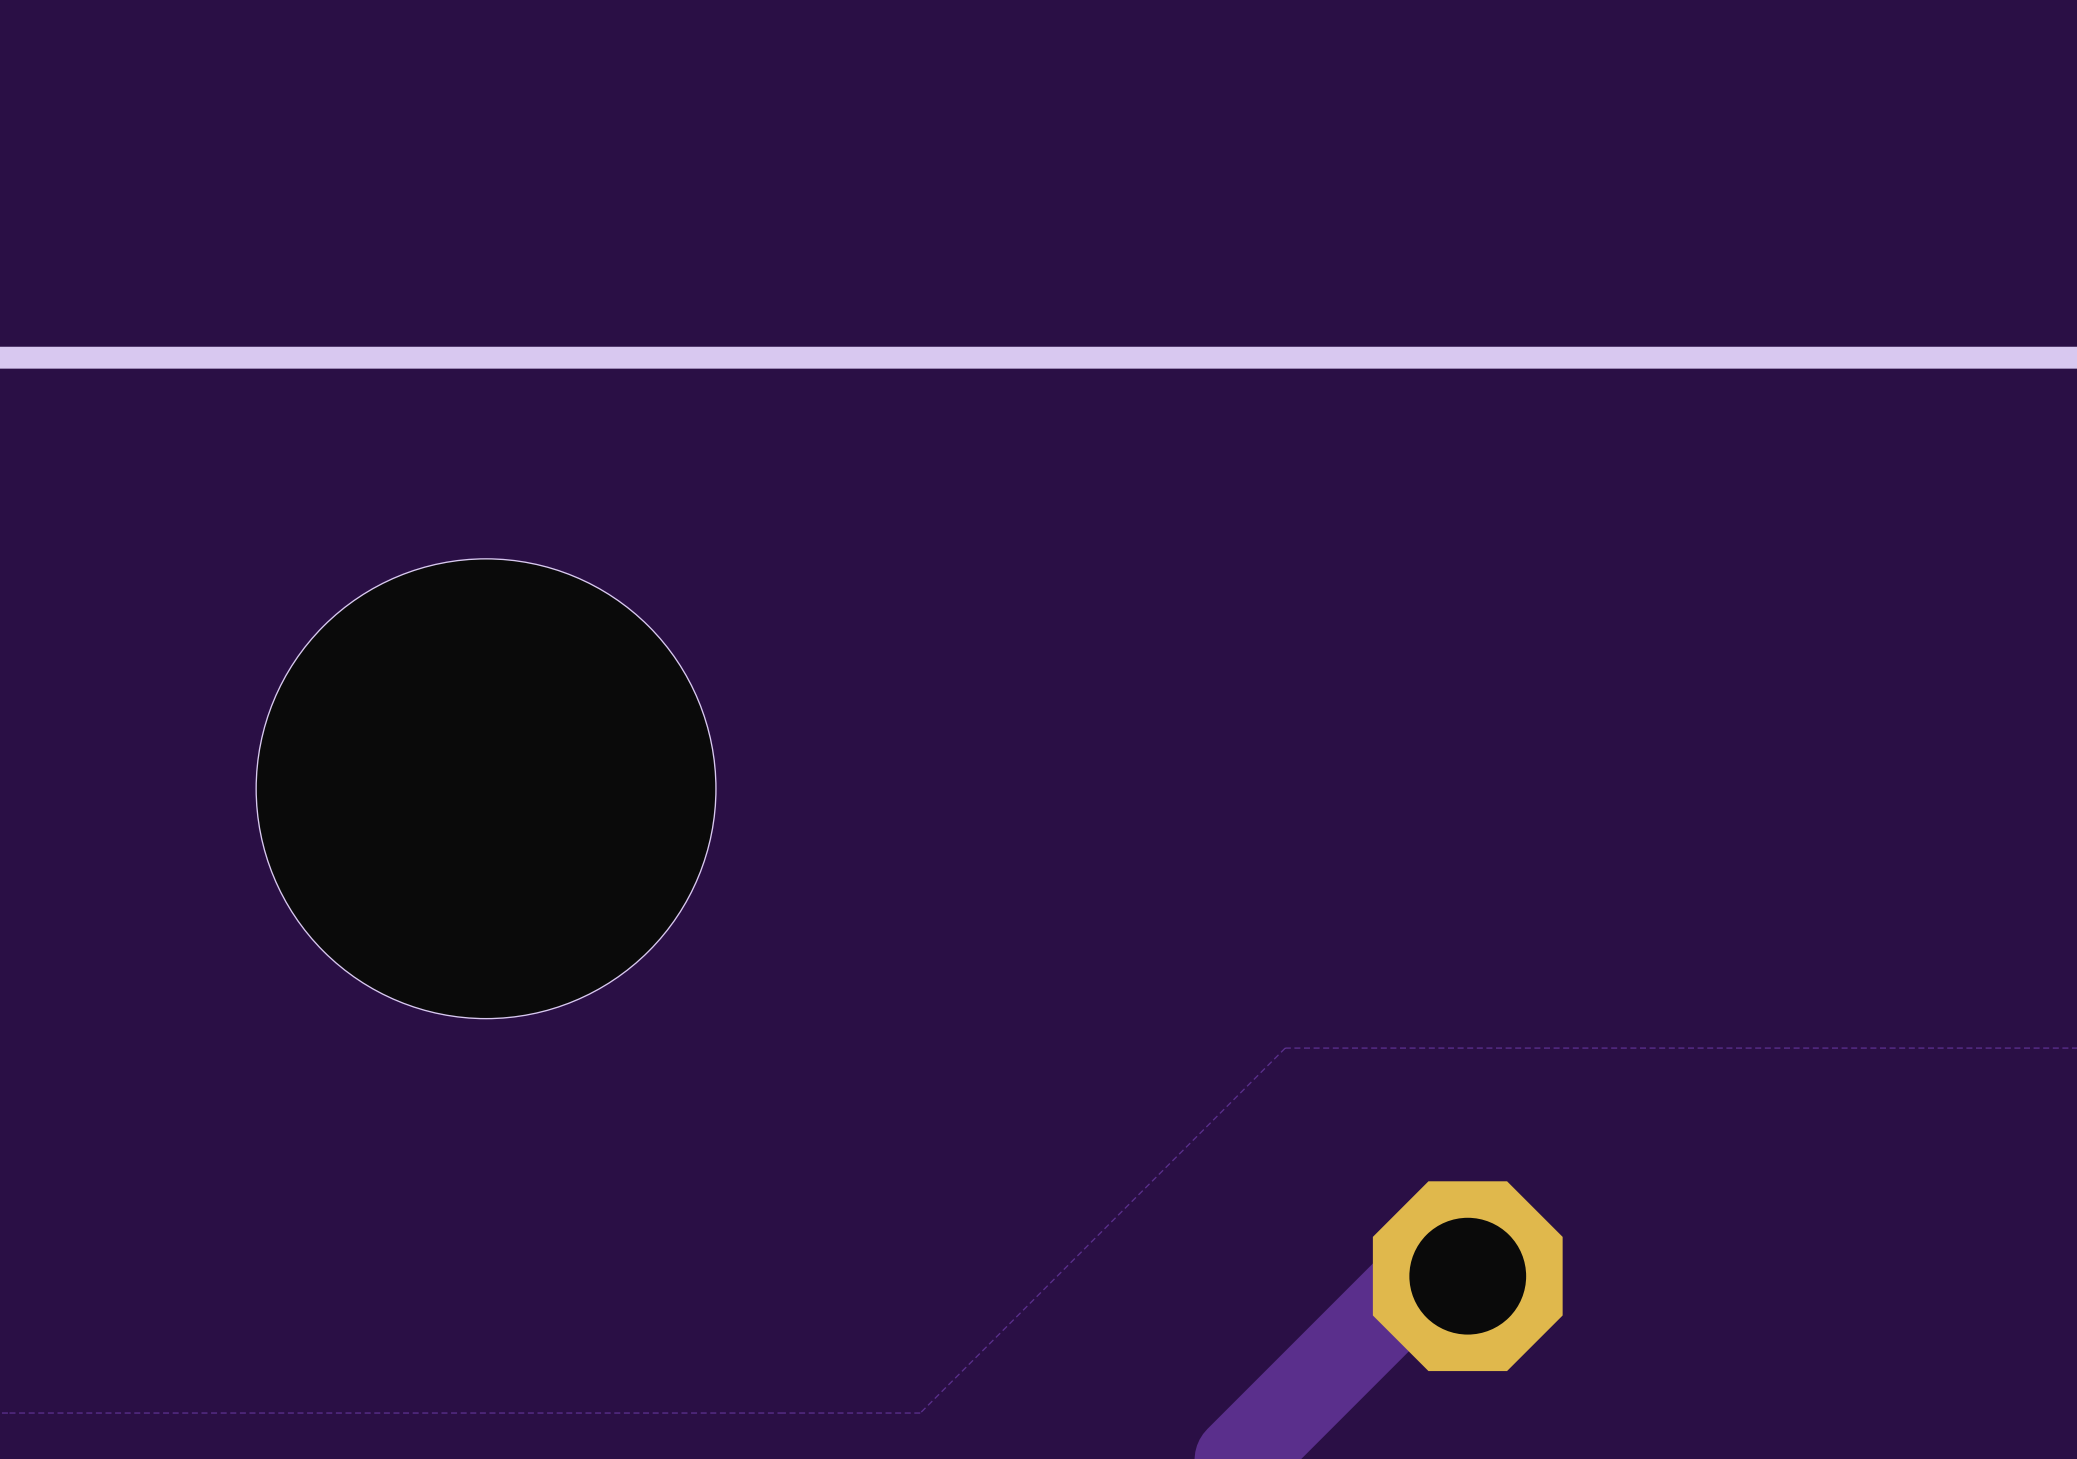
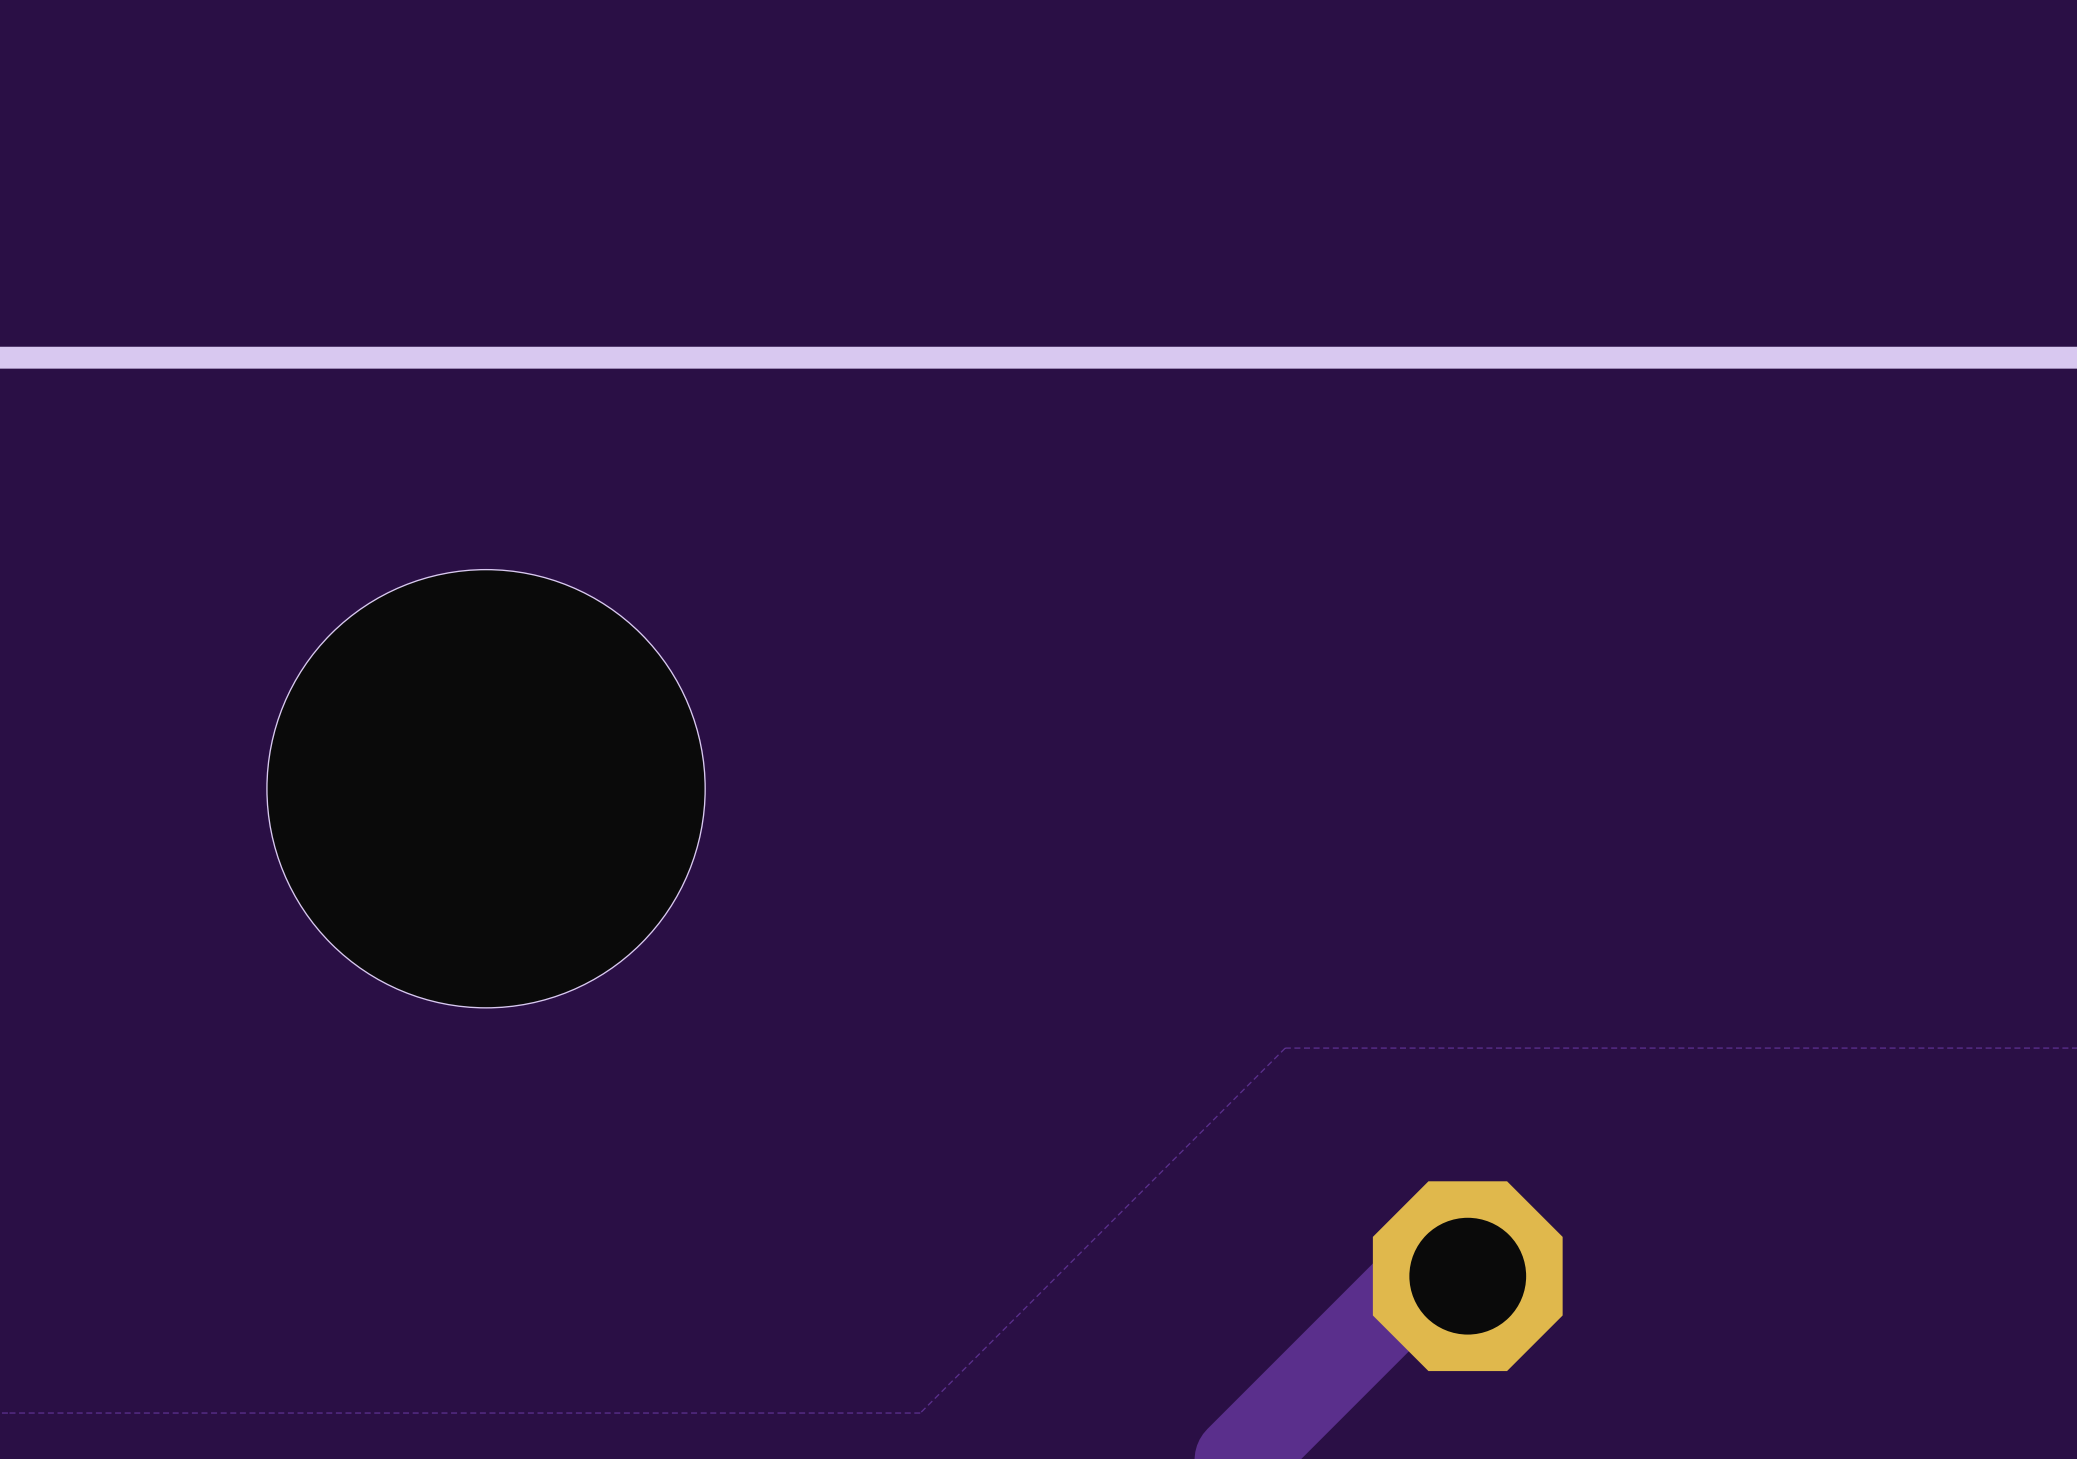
hole size: [256, 558, 716, 1019] -> [266, 569, 706, 1008]

